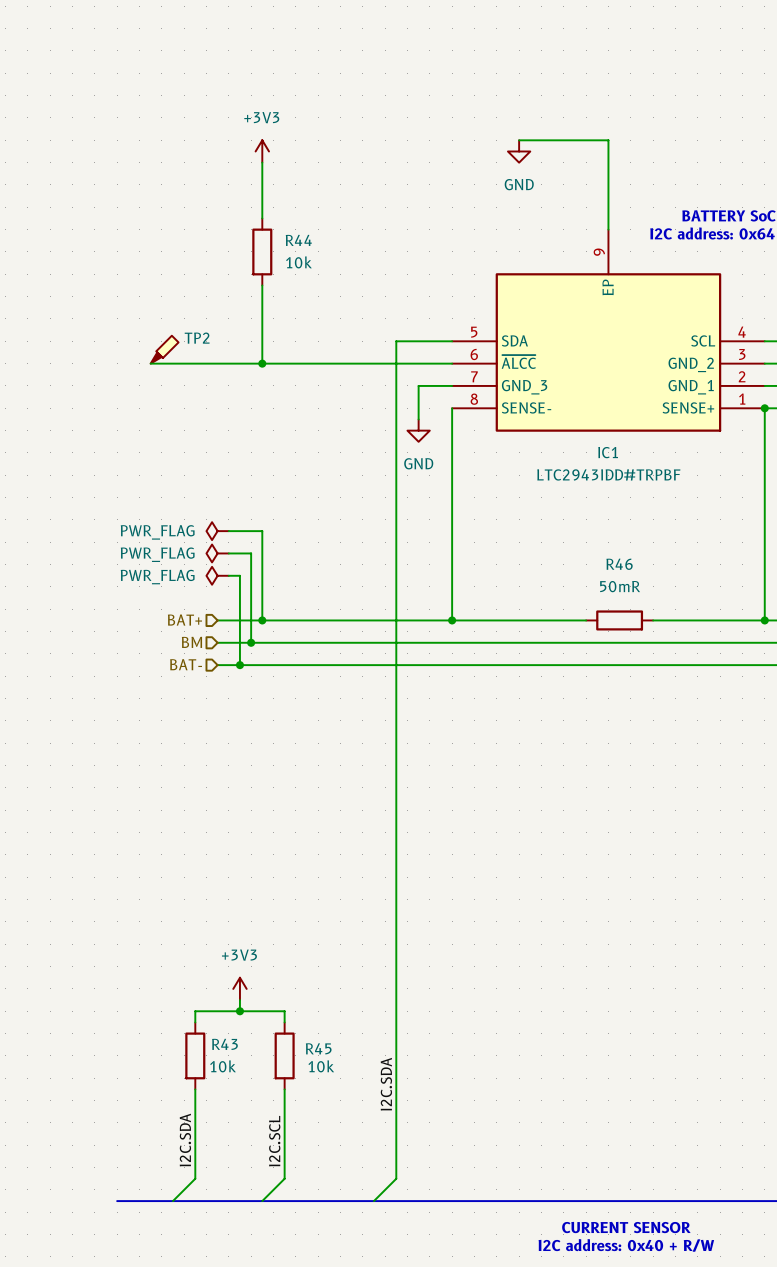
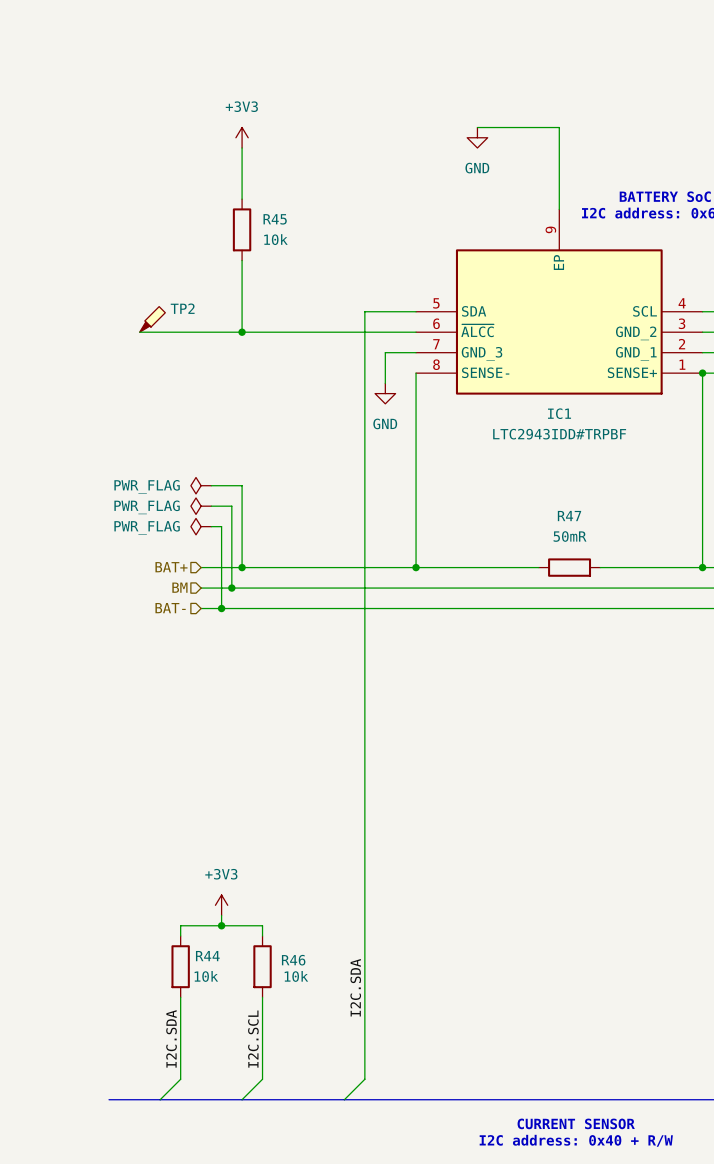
R44 name: R44 (298, 240) -> R45 (275, 219)
R46 name: R46 (619, 564) -> R47 (569, 516)
R43 name: R43 (224, 1044) -> R44 (207, 956)
R45 name: R45 (318, 1048) -> R46 (293, 960)

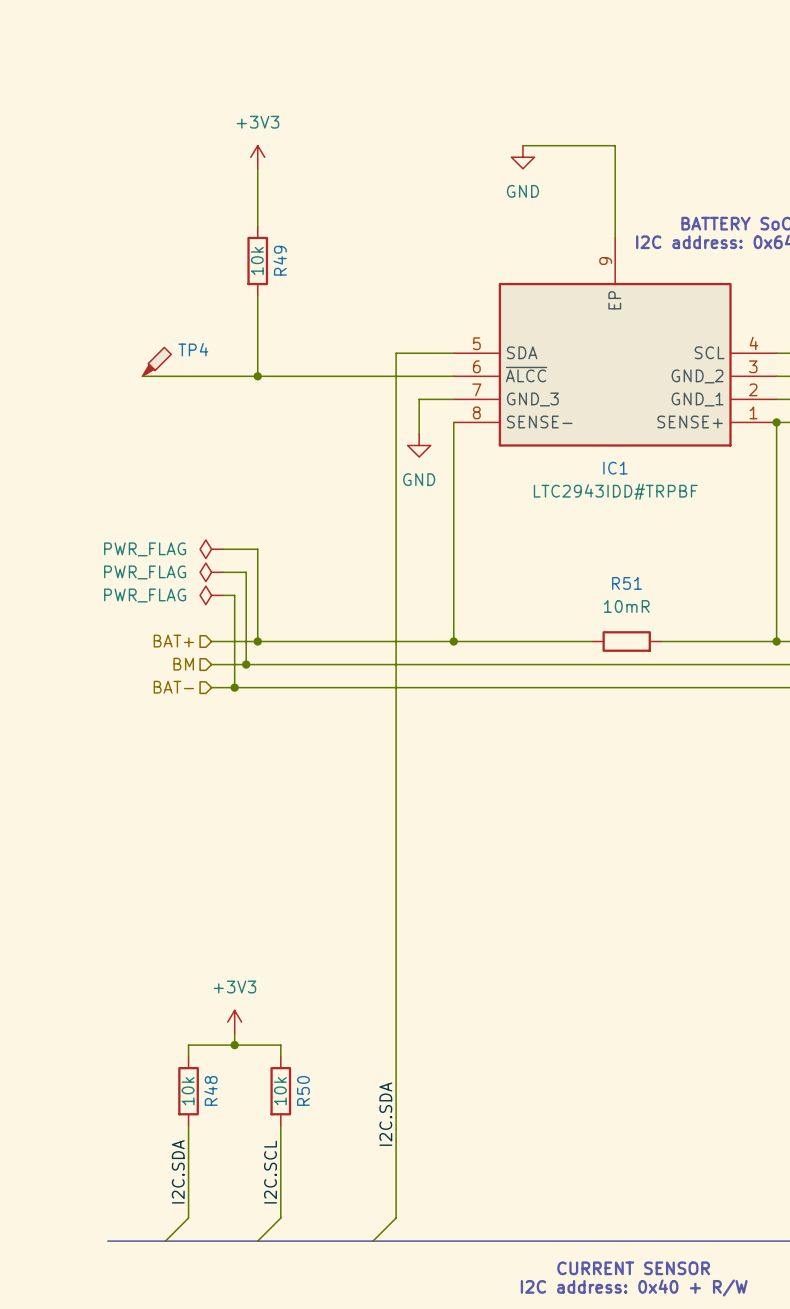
R45 name: R45 (275, 219) -> R49 (280, 260)
R45 value rotation: 0° (275, 239) -> 90° counterclockwise (257, 261)
R45 value position: 10k (275, 239) -> 10k (257, 261)
TP2 name: TP2 (182, 308) -> TP4 (193, 349)
R47 name: R47 (569, 516) -> R51 (627, 583)
R47 value: 50mR (570, 536) -> 10mR (626, 606)
R44 name: R44 (207, 956) -> R48 (210, 1090)
R46 name: R46 (293, 960) -> R50 (303, 1090)
R44 value rotation: 0° (206, 976) -> 90° counterclockwise (188, 1091)
R46 value rotation: 0° (296, 976) -> 90° counterclockwise (280, 1091)
R46 value position: 10k (296, 976) -> 10k (280, 1091)

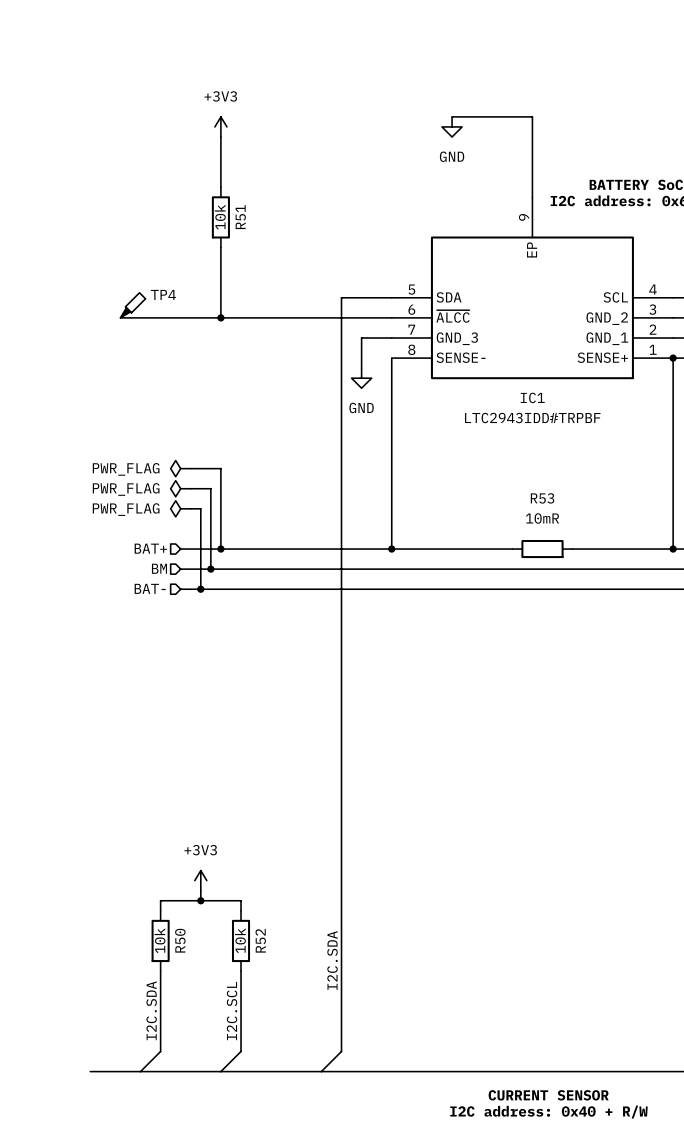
R49 name: R49 (280, 260) -> R51 (240, 217)
R51 name: R51 (627, 583) -> R53 (542, 498)
R48 name: R48 (210, 1090) -> R50 (180, 940)
R50 name: R50 (303, 1090) -> R52 (260, 940)

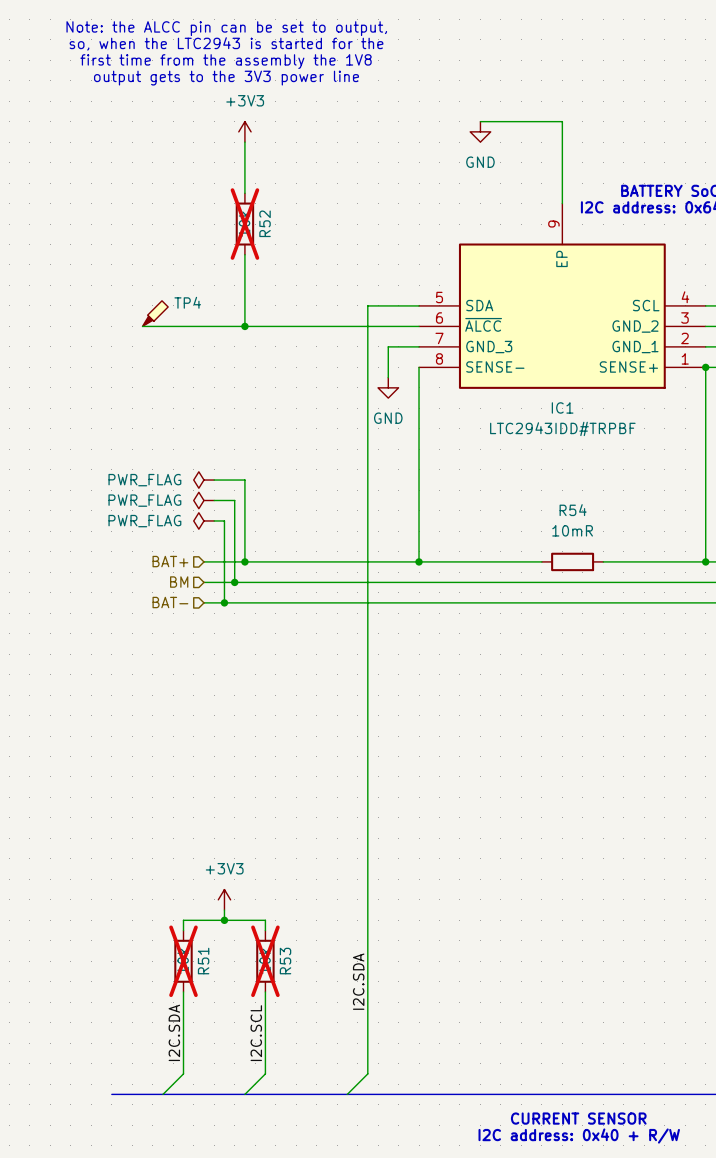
text: none -> Note: the ALCC pin can be set to output, (226, 28)
text: none -> so, when the LTC2943 is started for the (226, 43)
text: none -> first time from the assembly the 1V8 (226, 61)
text: none -> output gets to the 3V3 power line (226, 78)
R51 do-not-place cross: none -> (244, 224)
R51 name: R51 (240, 217) -> R52 (265, 223)
R53 name: R53 (542, 498) -> R54 (573, 510)
R50 do-not-place cross: none -> (183, 961)
R50 name: R50 (180, 940) -> R51 (203, 961)
R52 do-not-place cross: none -> (265, 961)
R52 name: R52 (260, 940) -> R53 (285, 961)

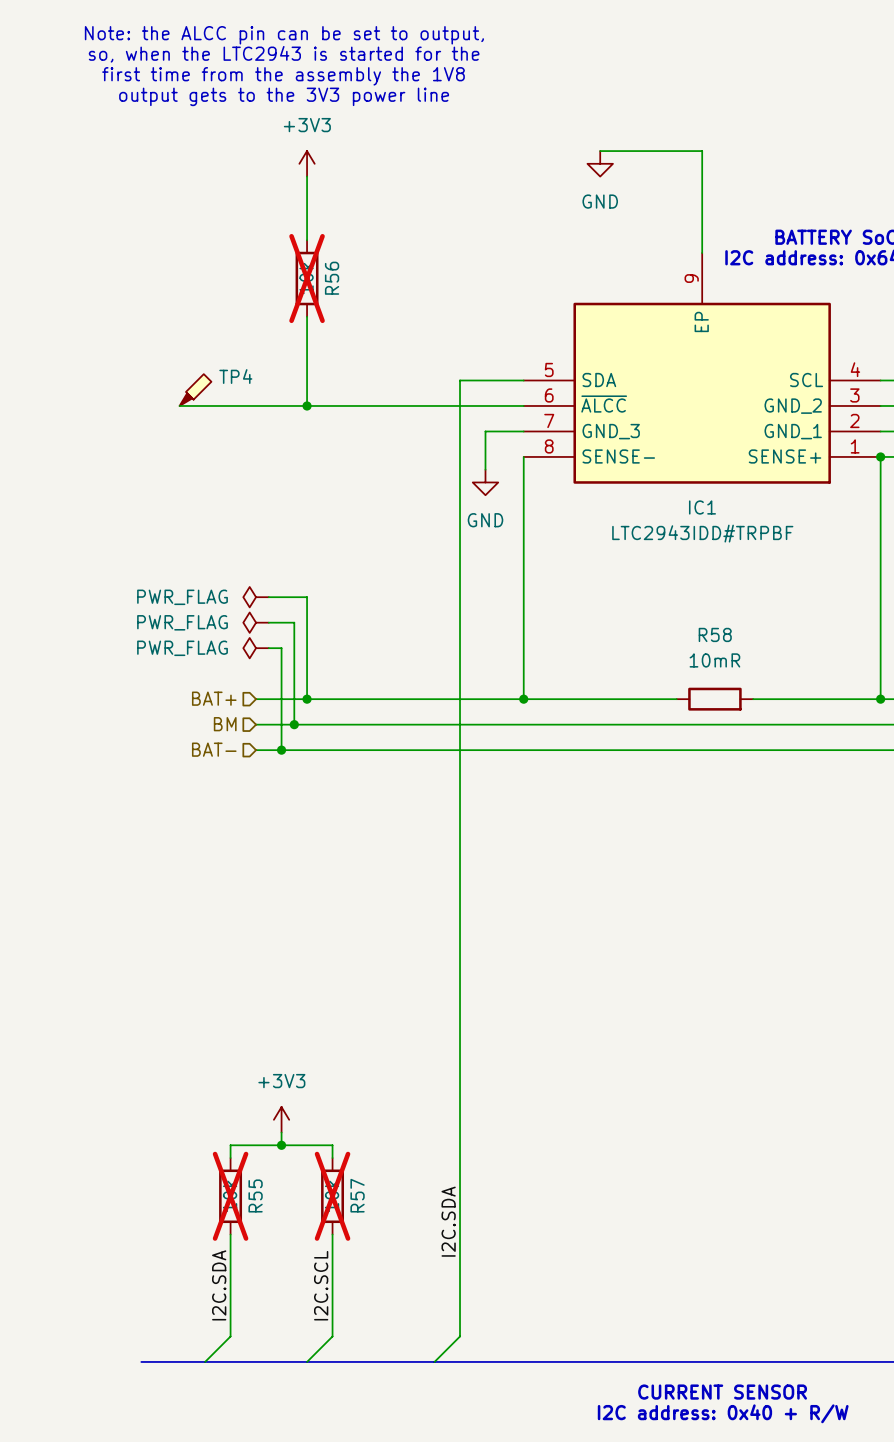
R52 name: R52 (265, 223) -> R56 (332, 278)
R54 name: R54 (573, 510) -> R58 (715, 634)
R51 name: R51 (203, 961) -> R55 (255, 1195)
R53 name: R53 (285, 961) -> R57 (357, 1195)

